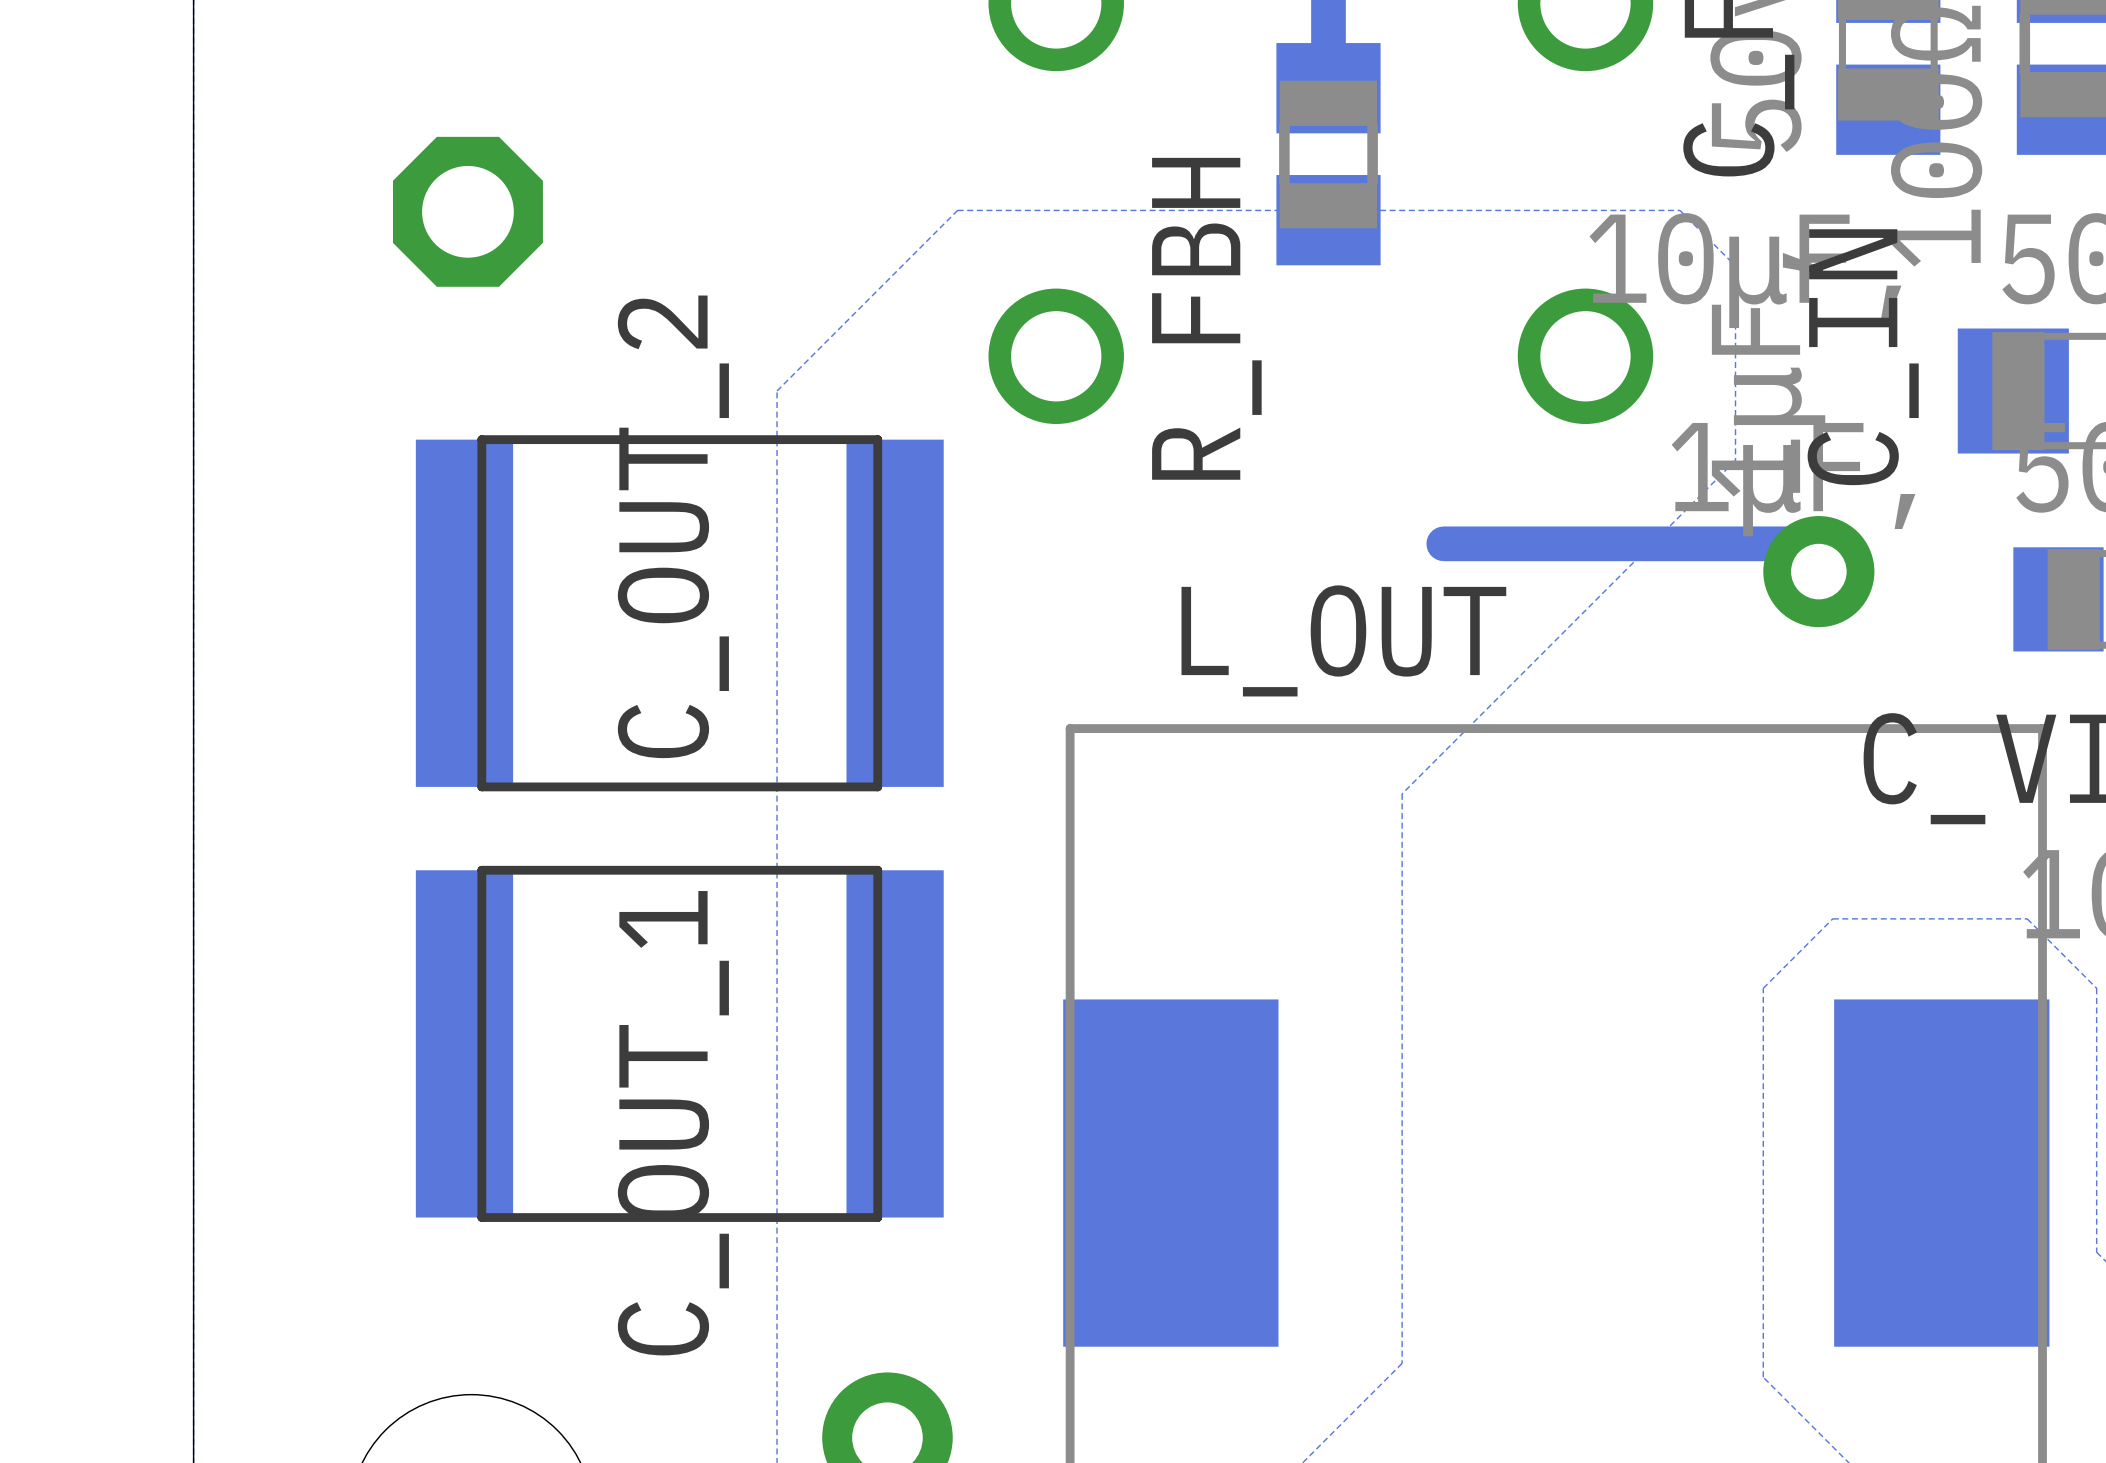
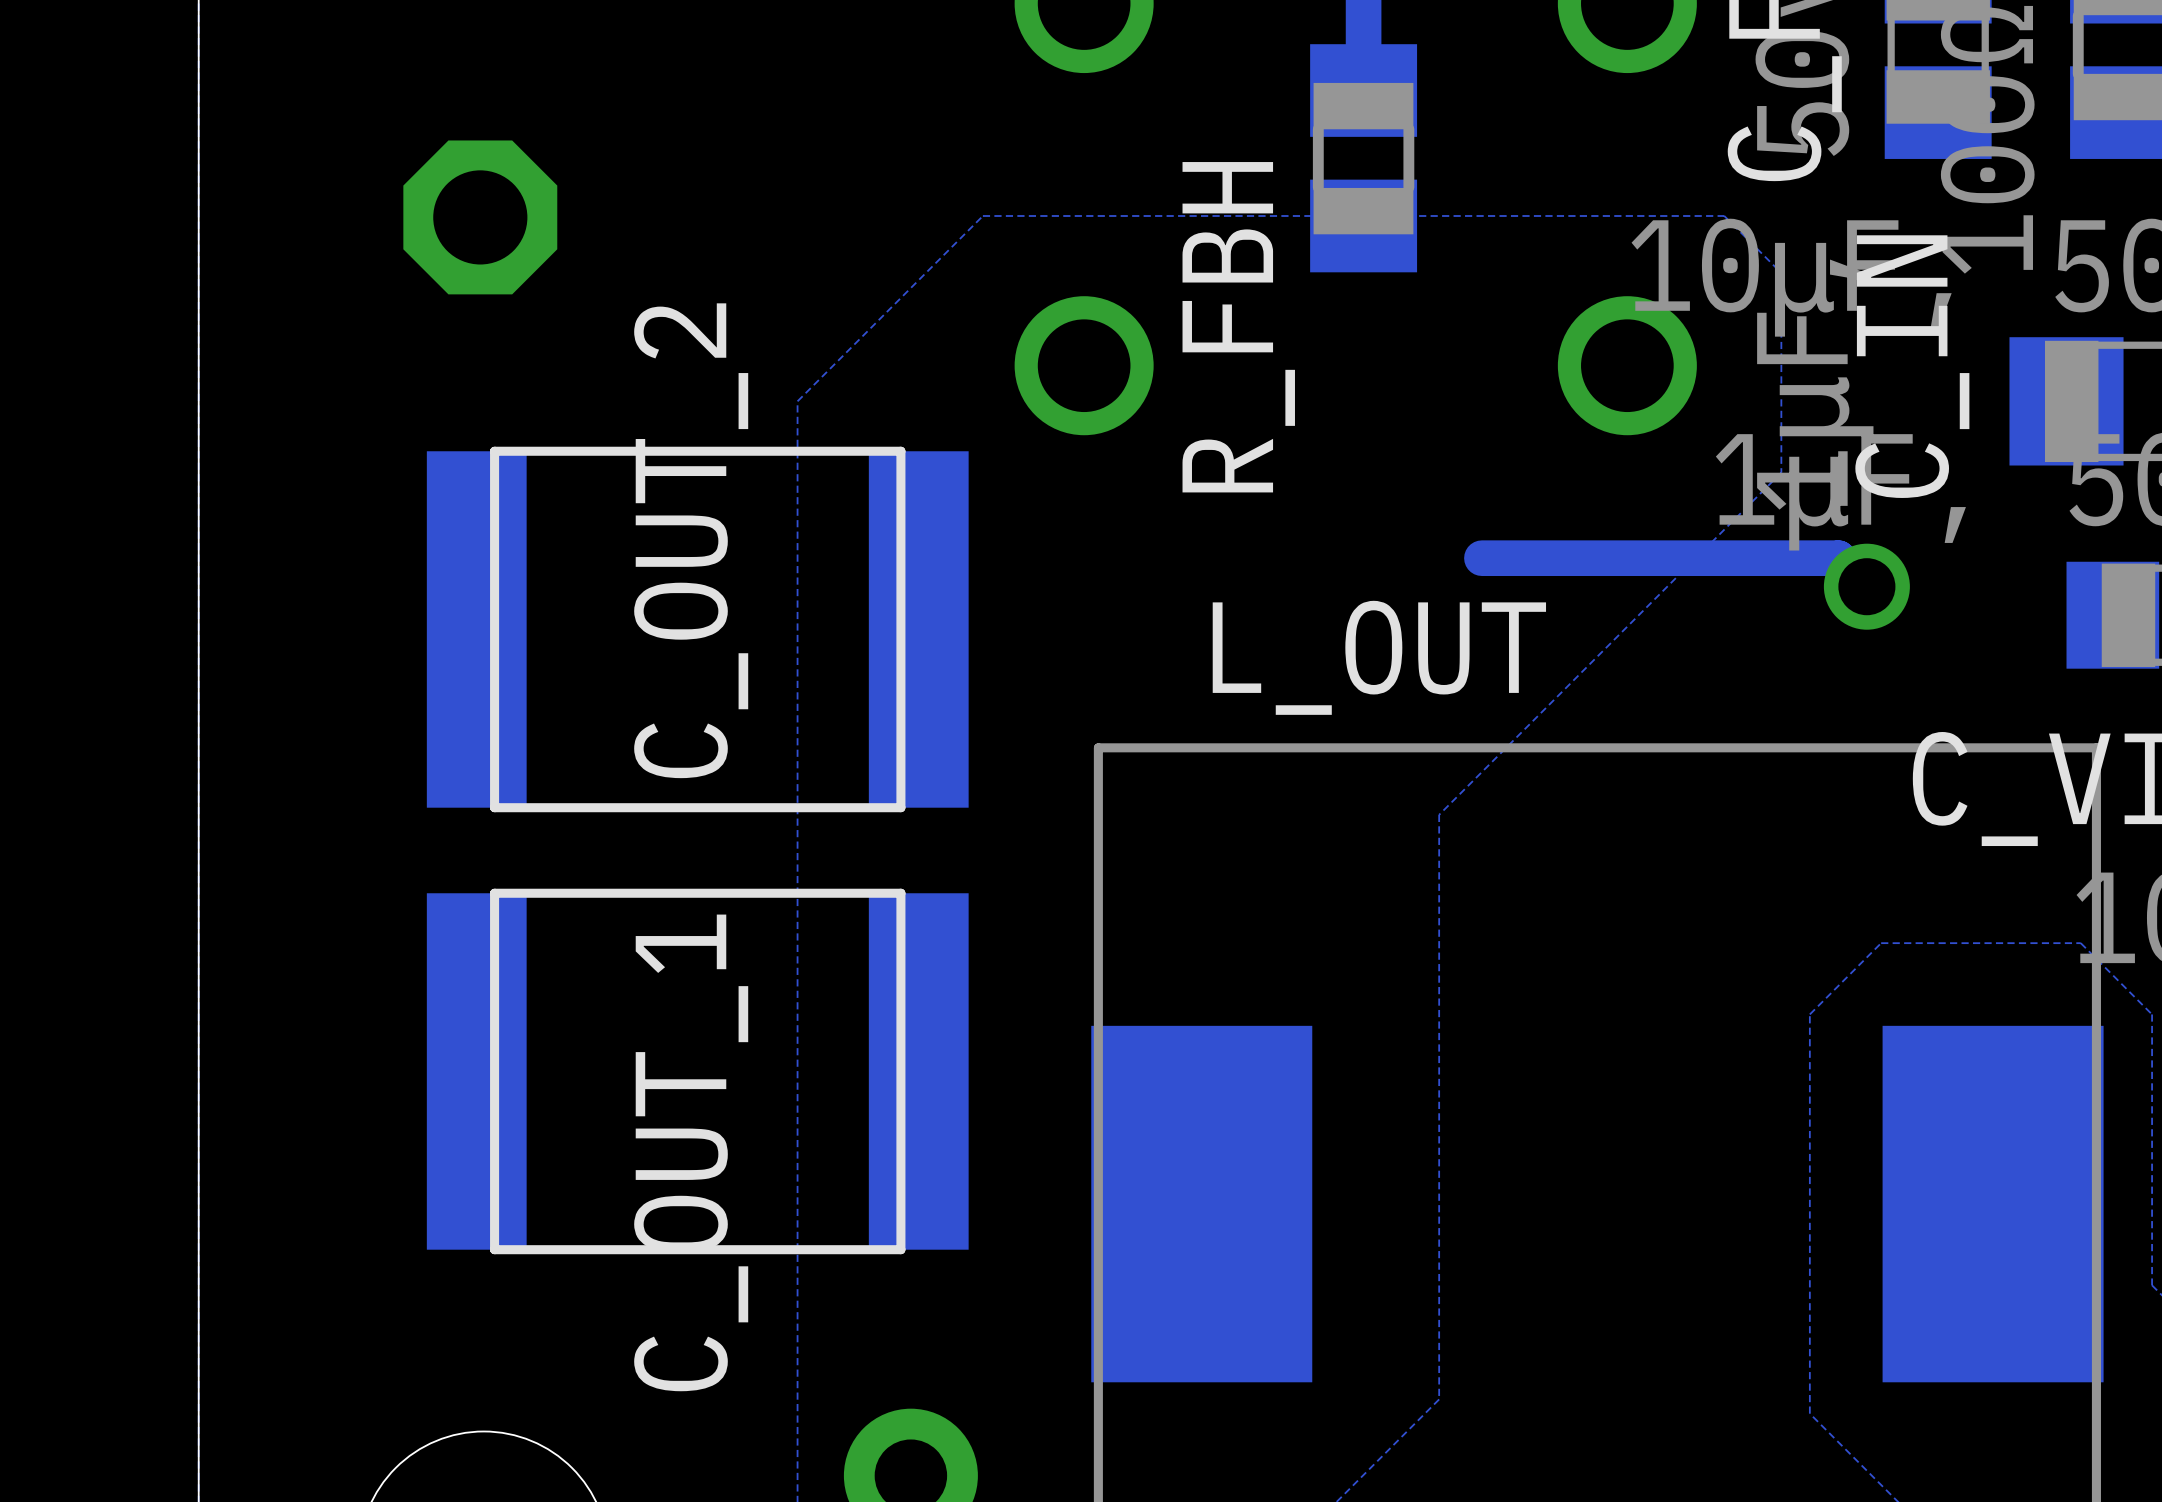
via size: [1763, 516, 1875, 628] -> [1823, 543, 1910, 630]

